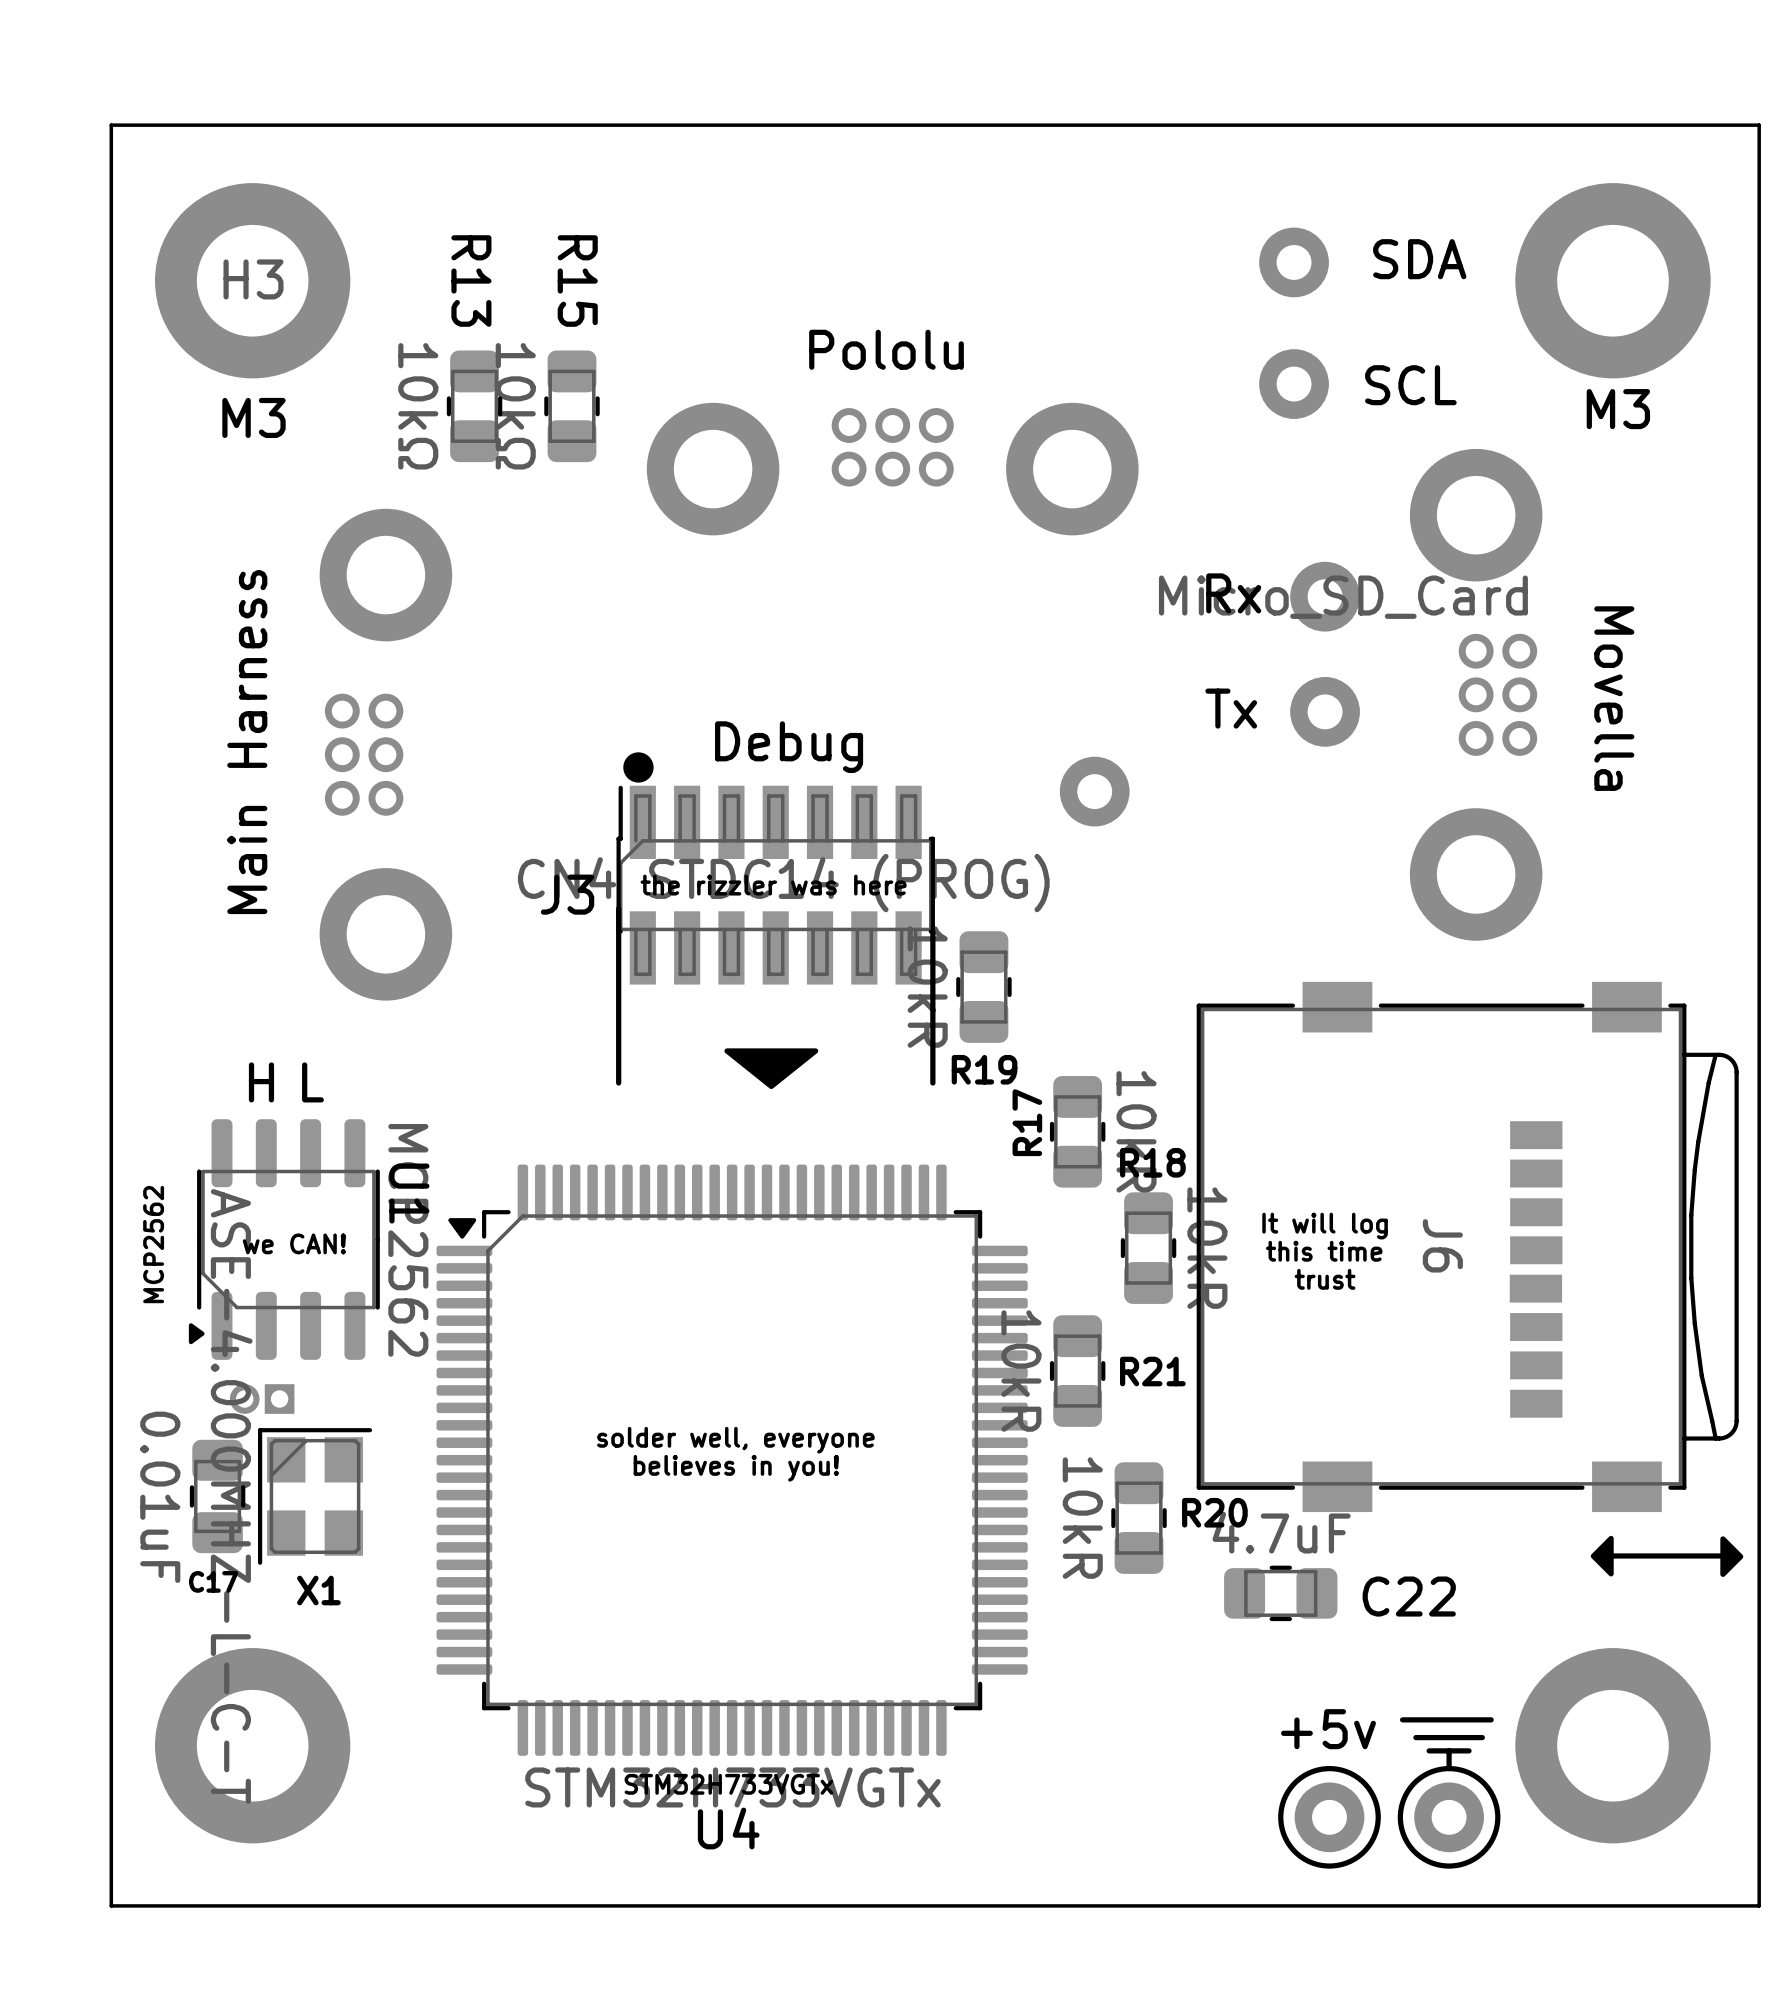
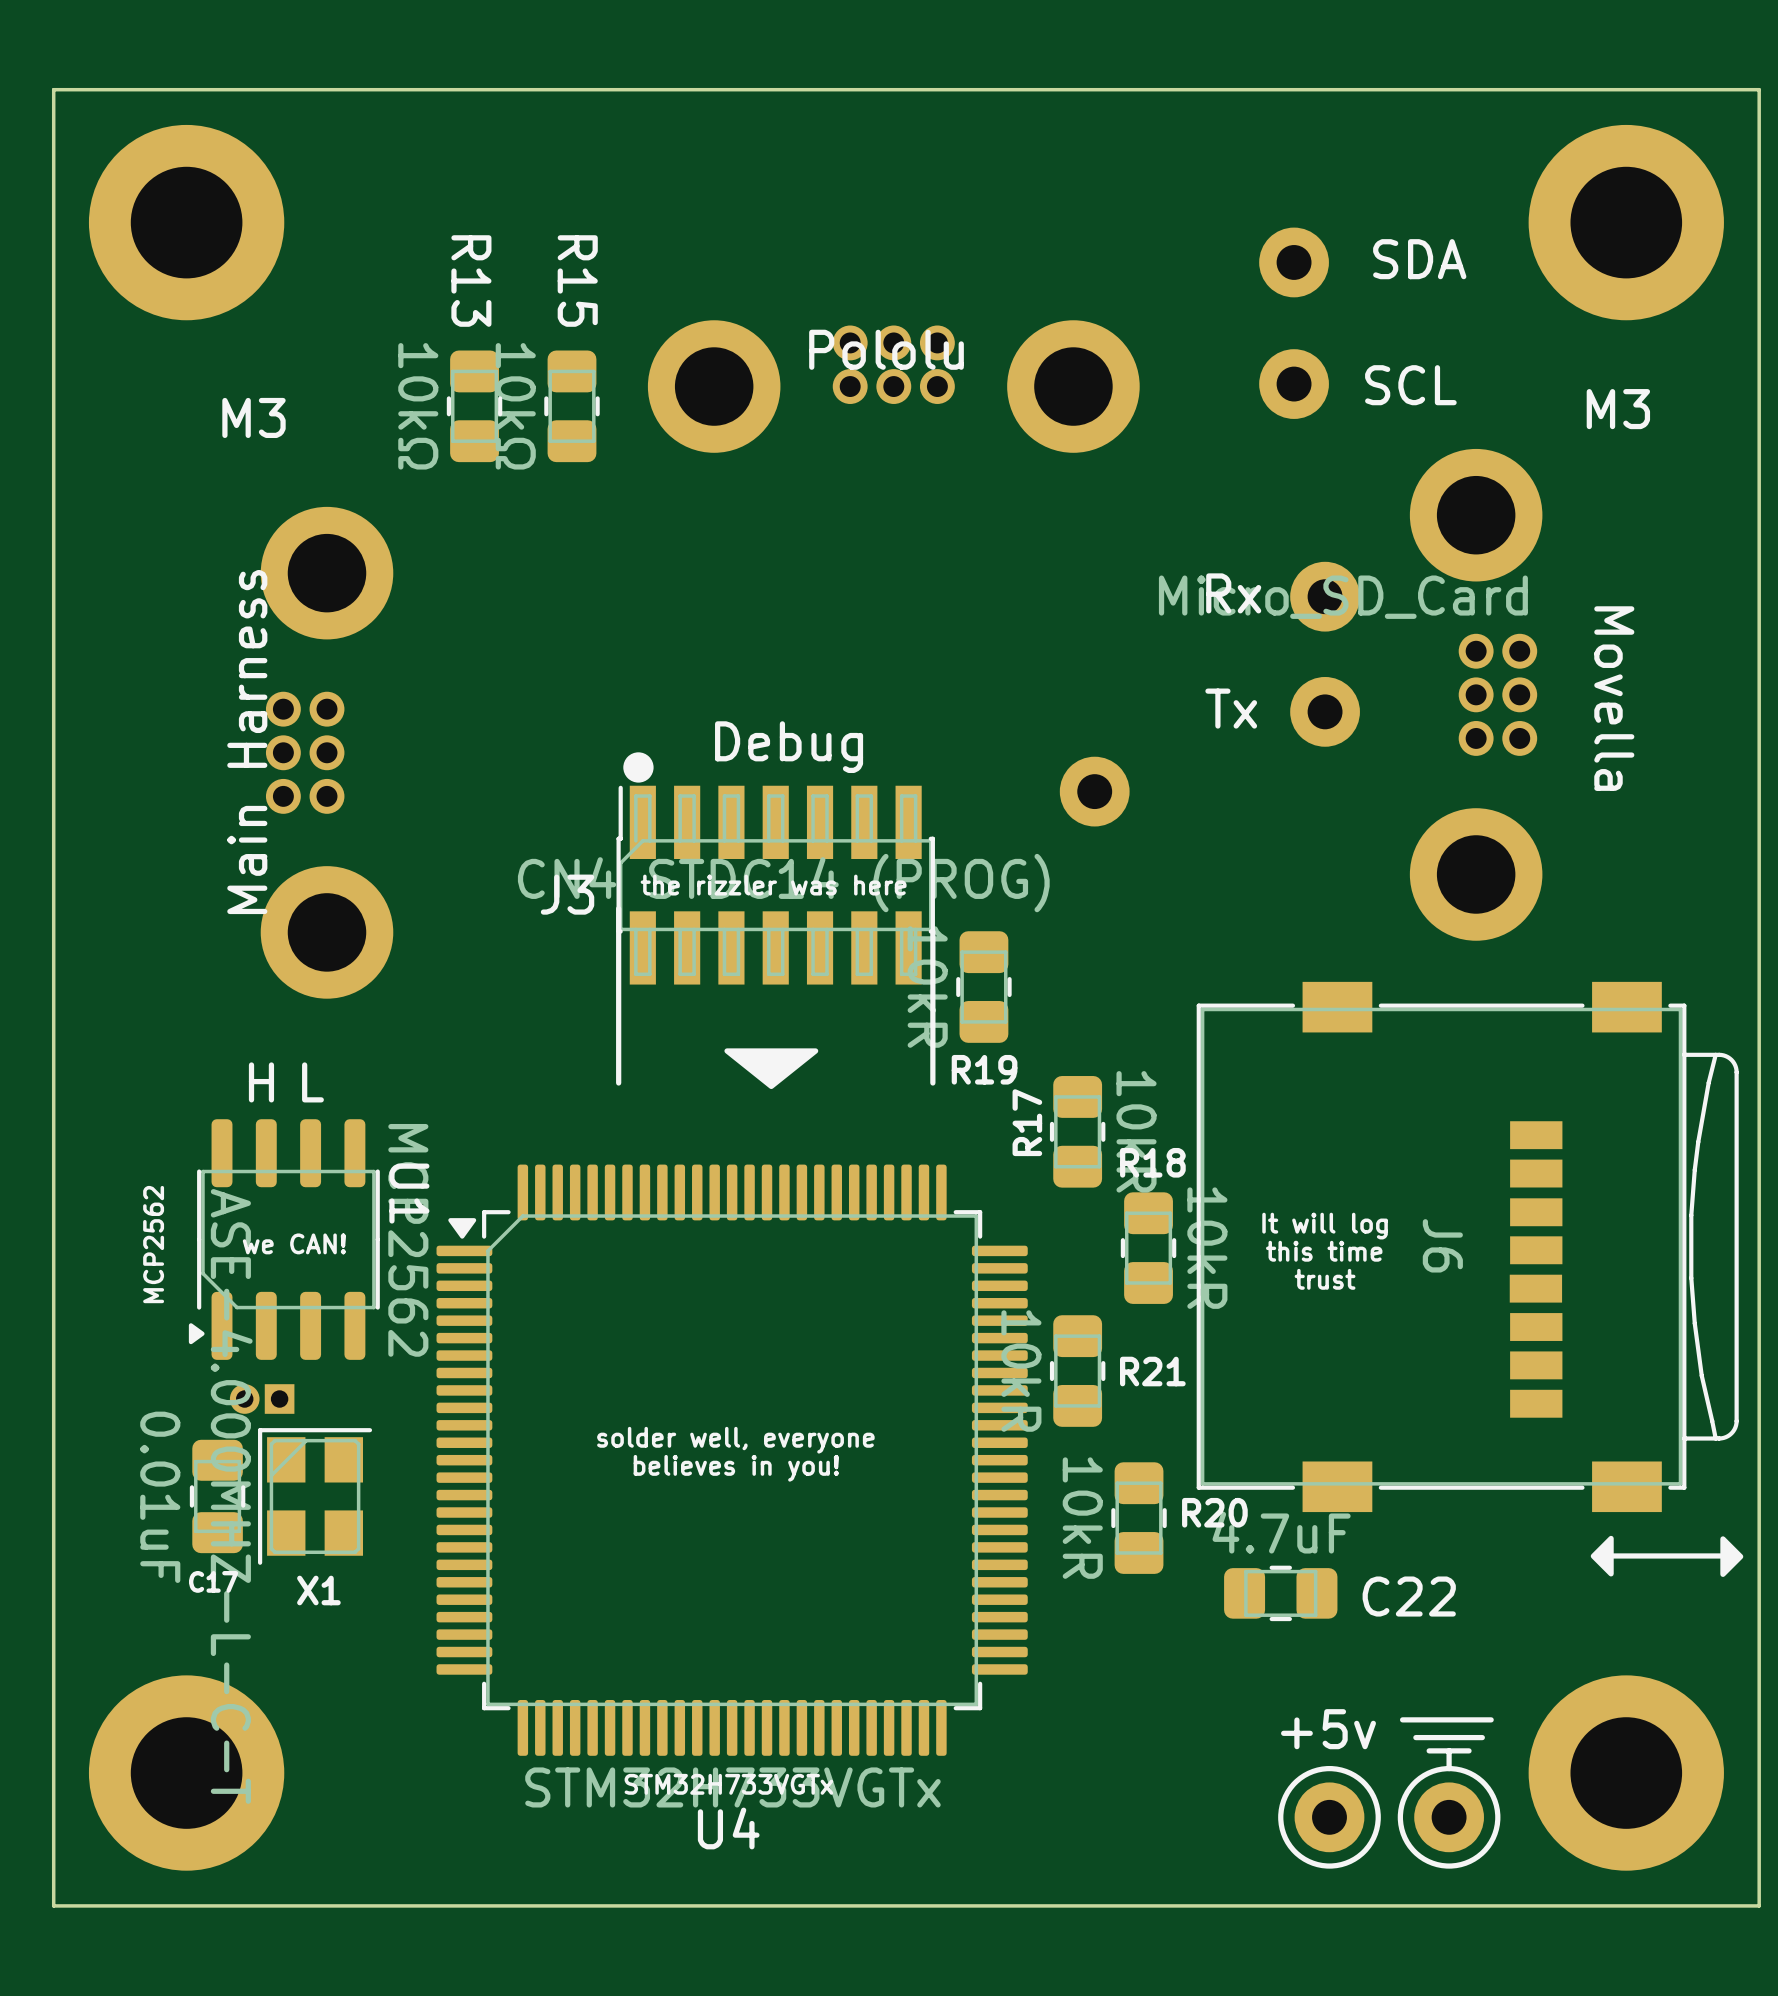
board edge: (1759, 125) (111, 125) (111, 1905) -> (1759, 125) (1759, 89) (53, 89) (53, 1905) (111, 1905)
H3 position: (252, 280) -> (186, 222)
part position: (1613, 280) -> (1626, 222)
part position: (892, 469) -> (893, 386)
part position: (385, 754) -> (326, 752)
part position: (252, 1745) -> (186, 1773)
part position: (1613, 1745) -> (1626, 1773)

